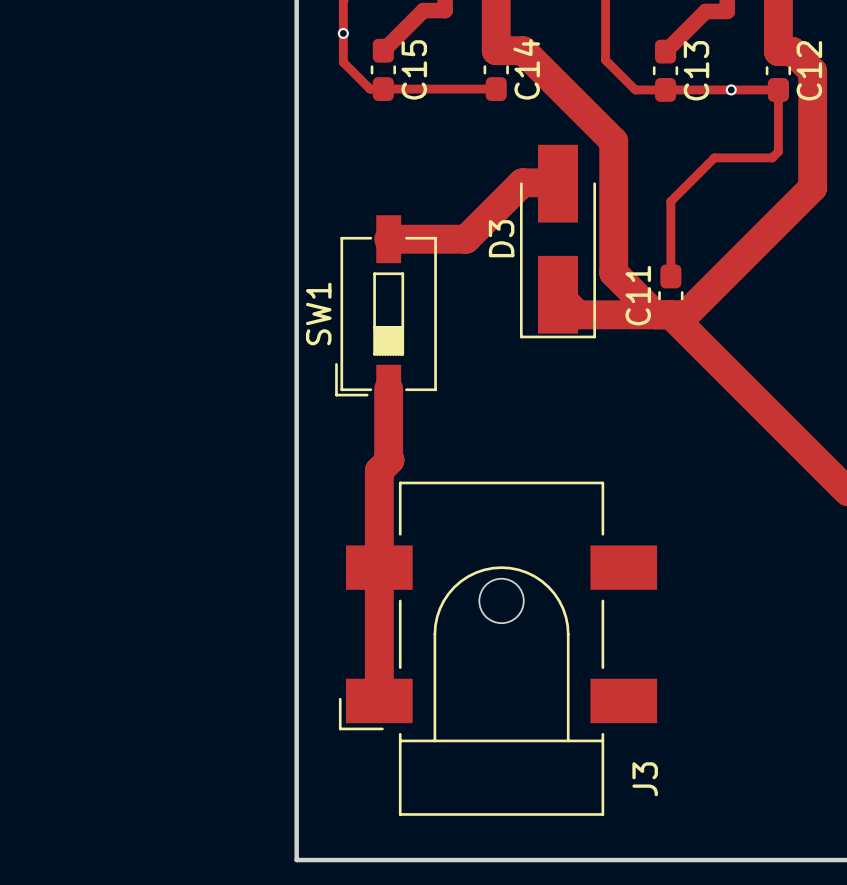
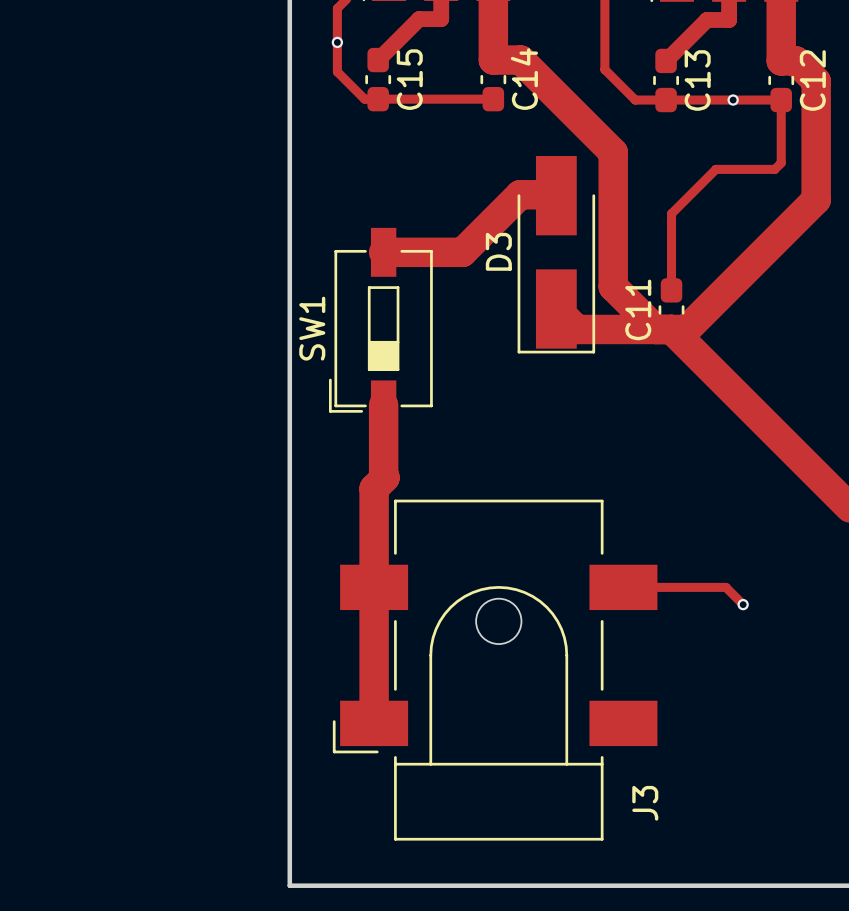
track: none -> (623, 587) (725, 587) (743, 604)
via: none -> (743, 604)

